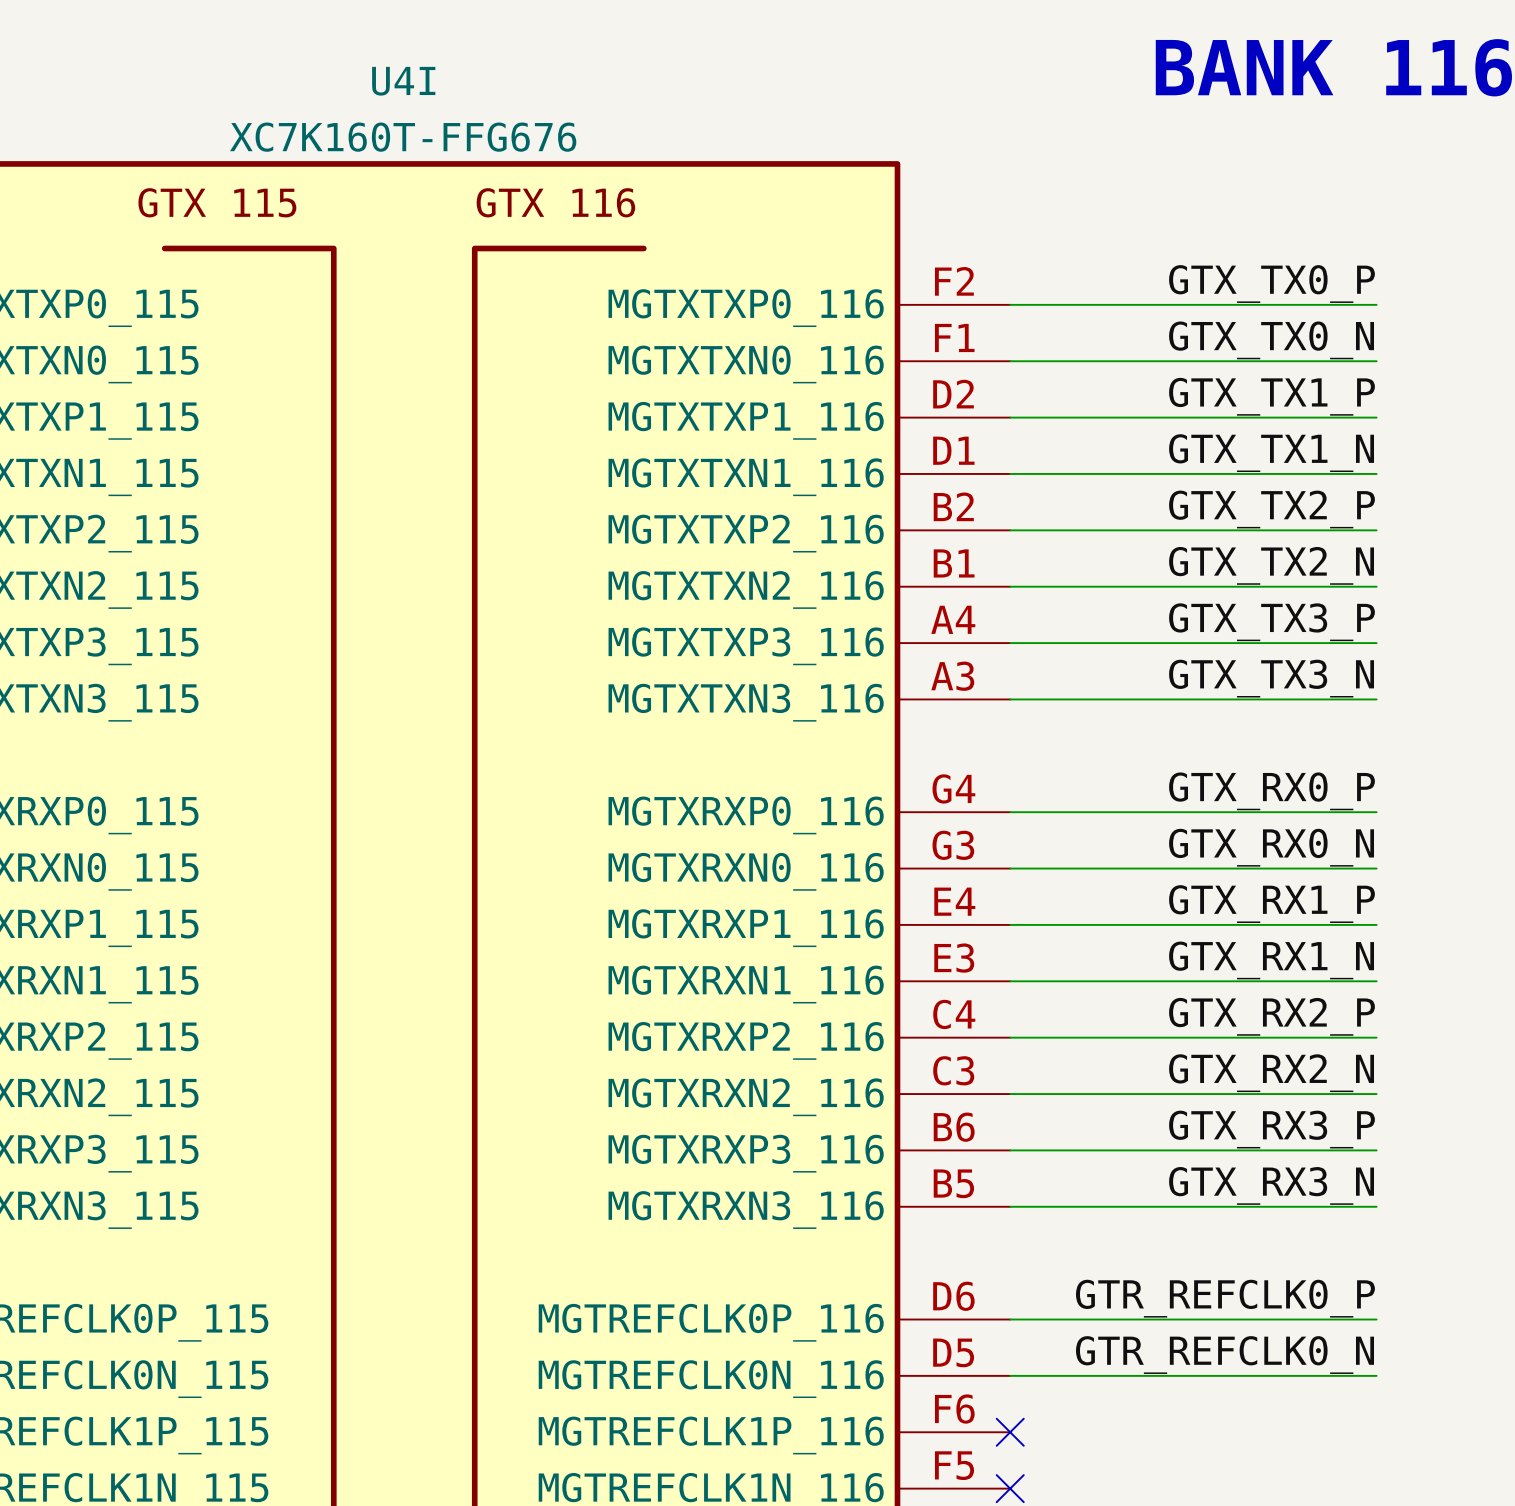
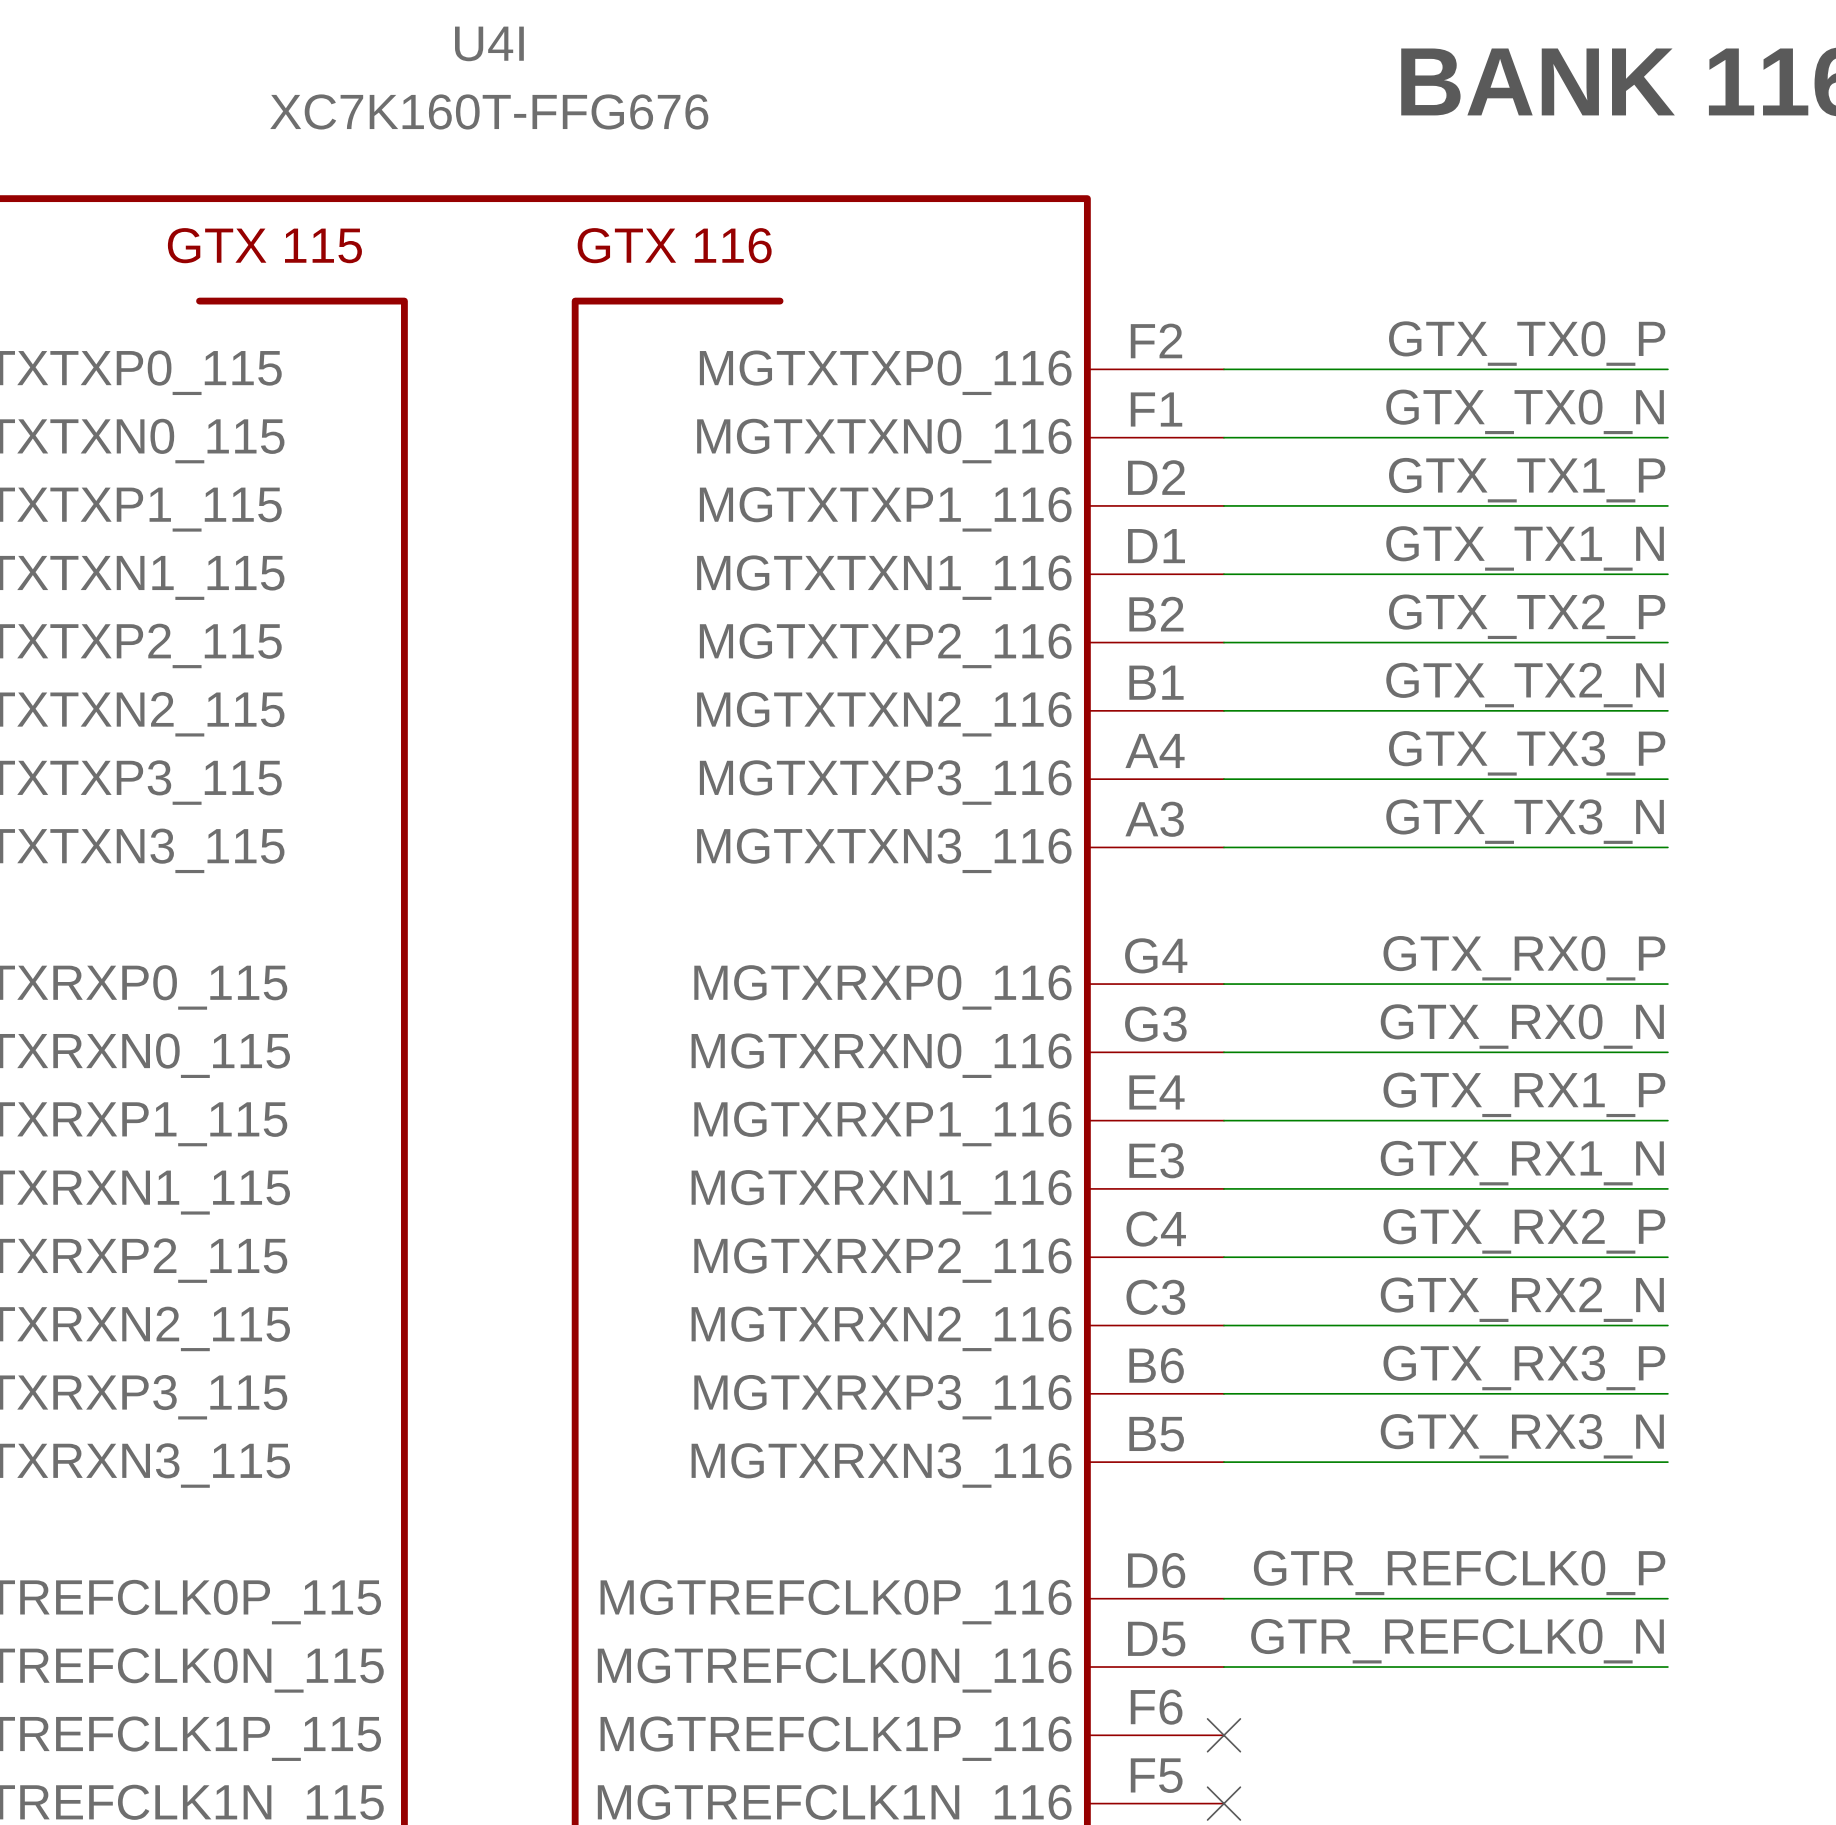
U4I name position: U4I (403, 81) -> U4I (489, 43)
U4I value position: XC7K160T-FFG676 (403, 137) -> XC7K160T-FFG676 (489, 111)

